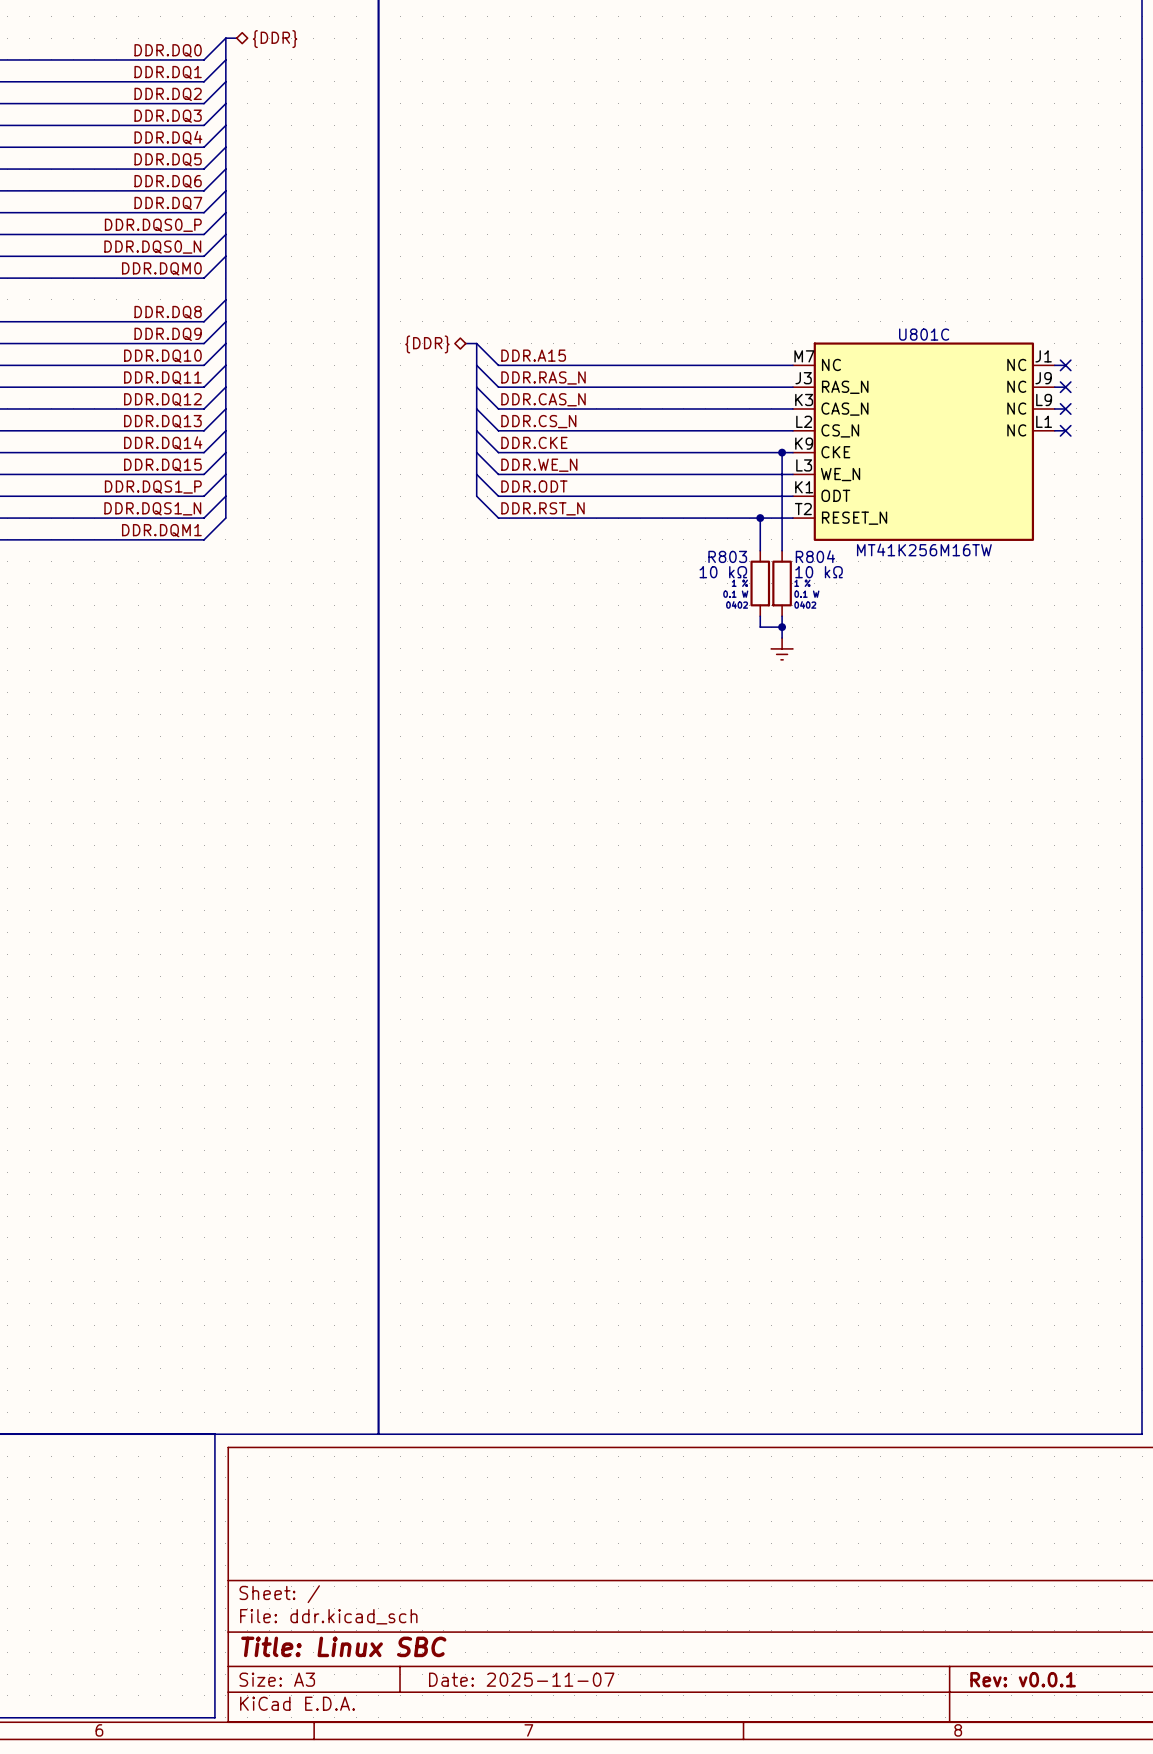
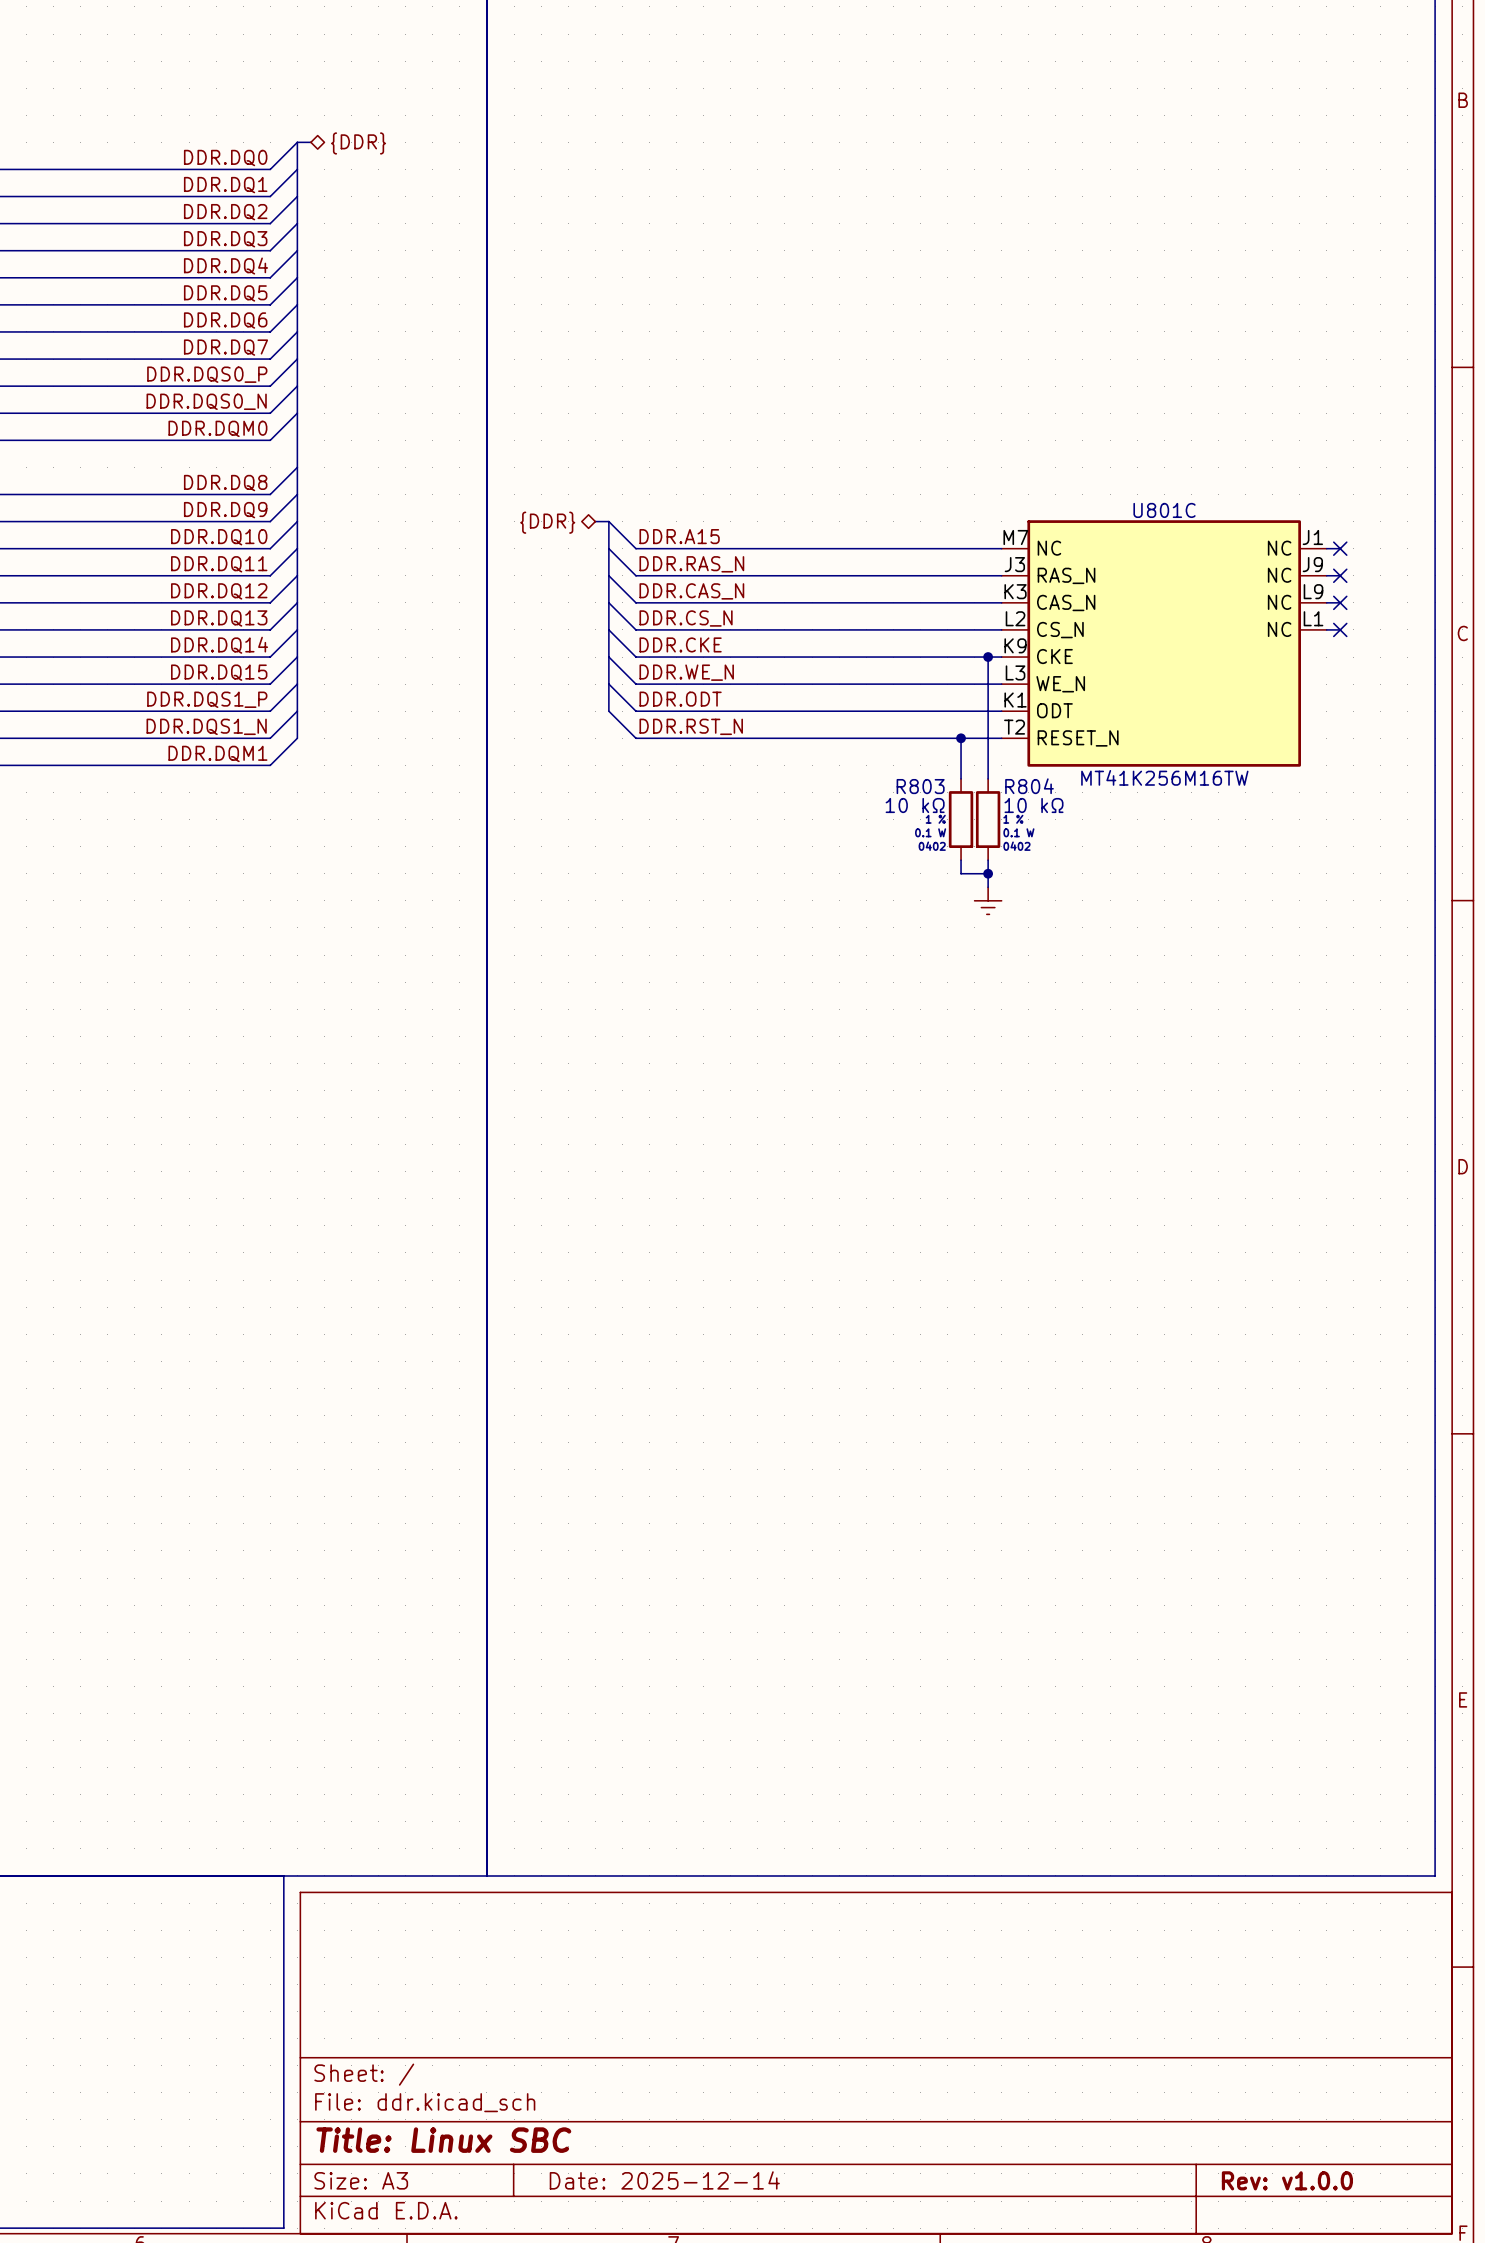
title block: Date: 2025-11-07 (521, 1679) -> Date: 2025-12-14 (664, 2180)
title block: Rev: v0.0.1 (1023, 1679) -> Rev: v1.0.0 (1287, 2180)

